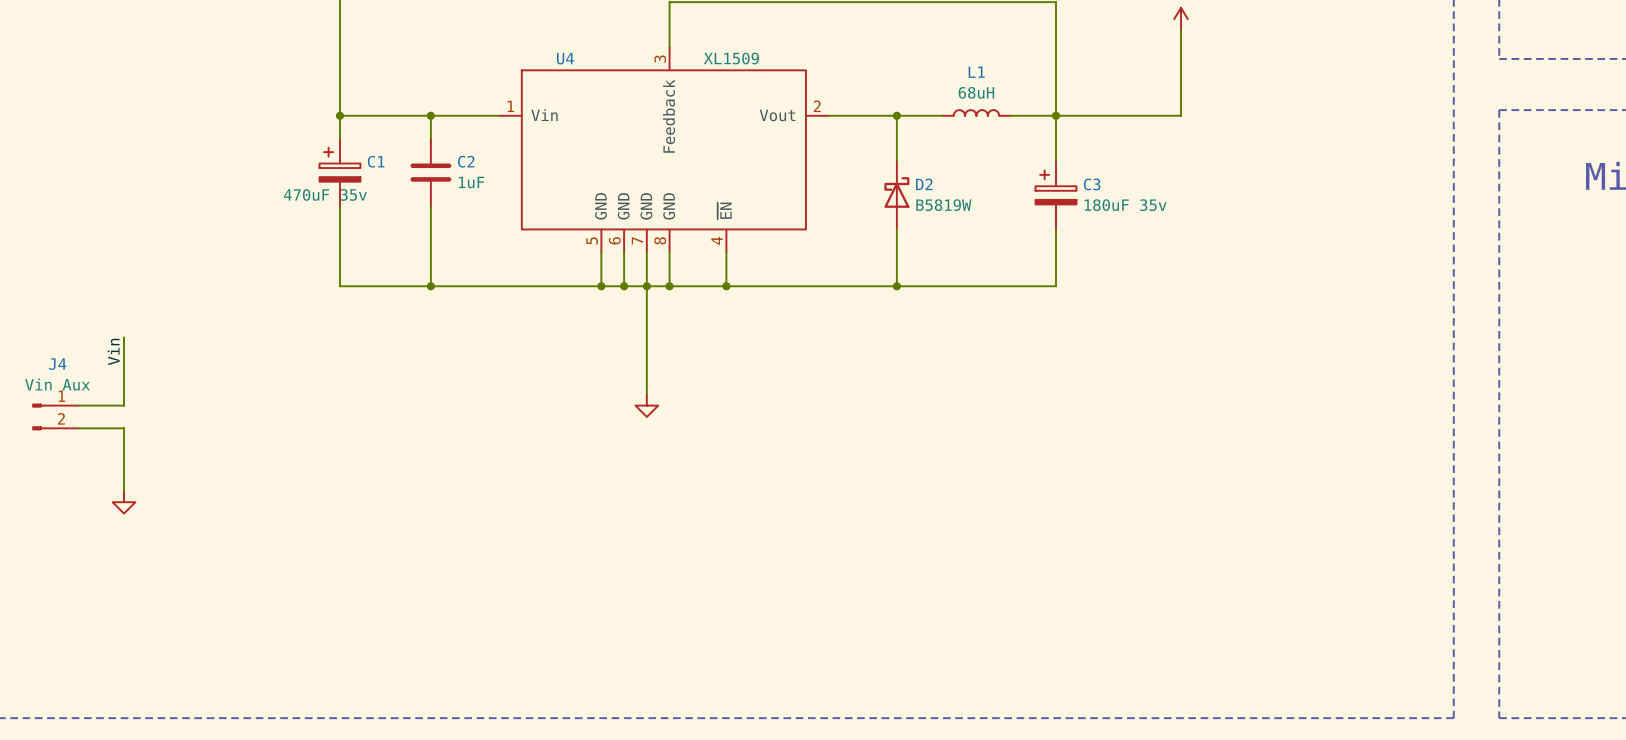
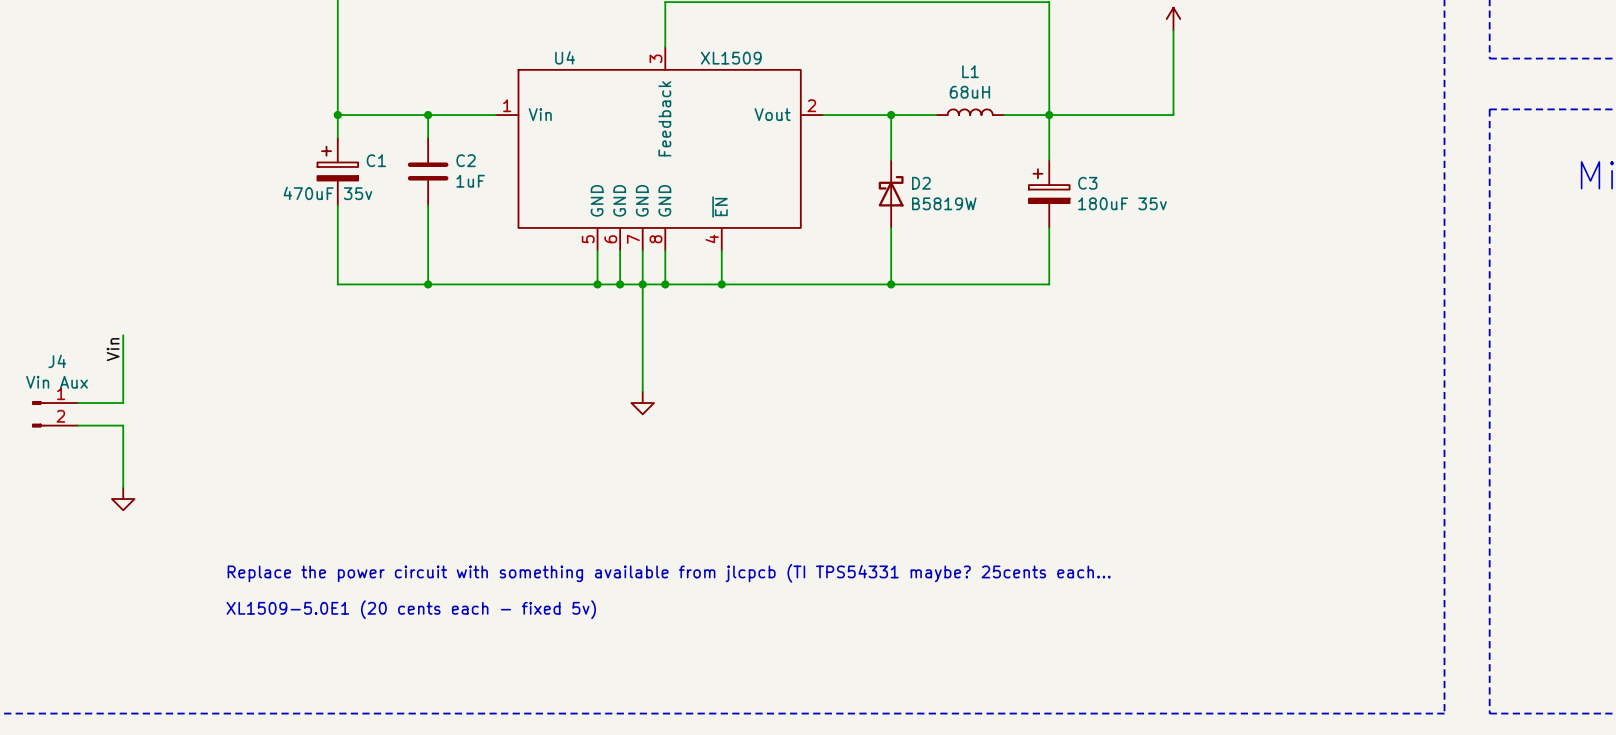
text: none -> Replace the power circuit with something available from jlcpcb (TI TPS54331 maybe? 25cents each... (669, 573)
text: none -> XL1509-5.0E1 (20 cents each - fixed 5v) (411, 609)

